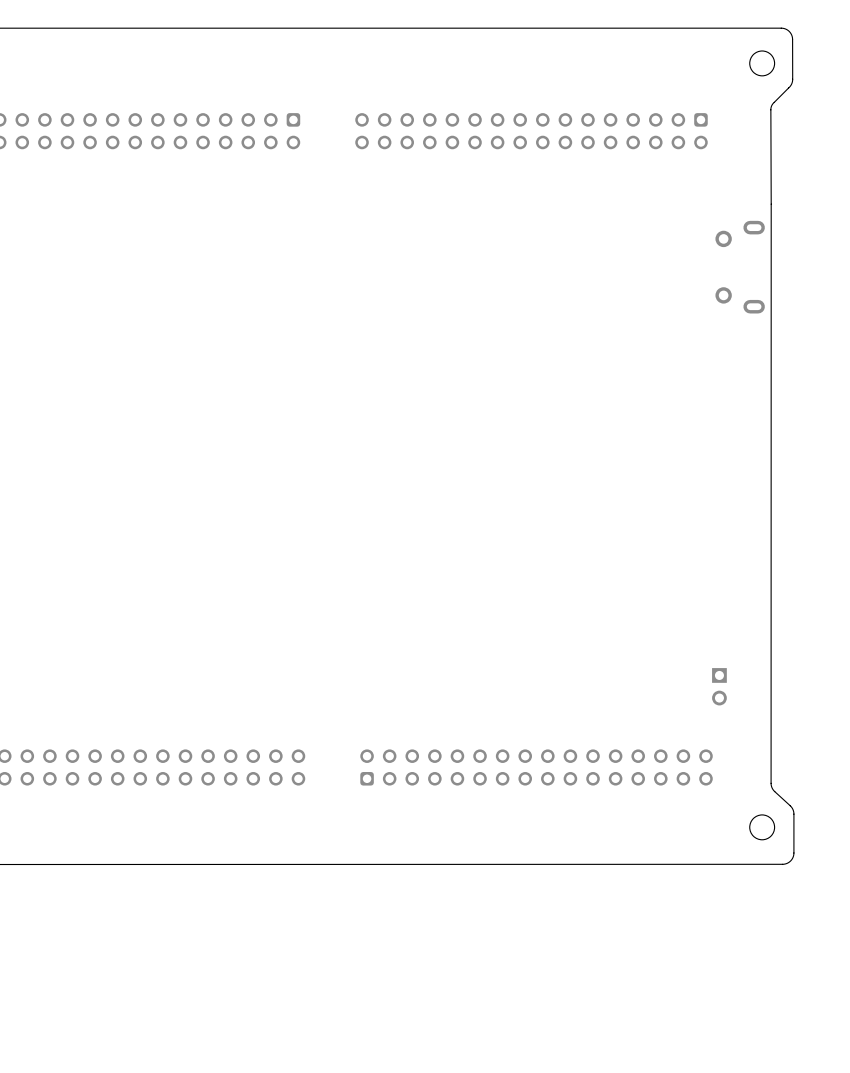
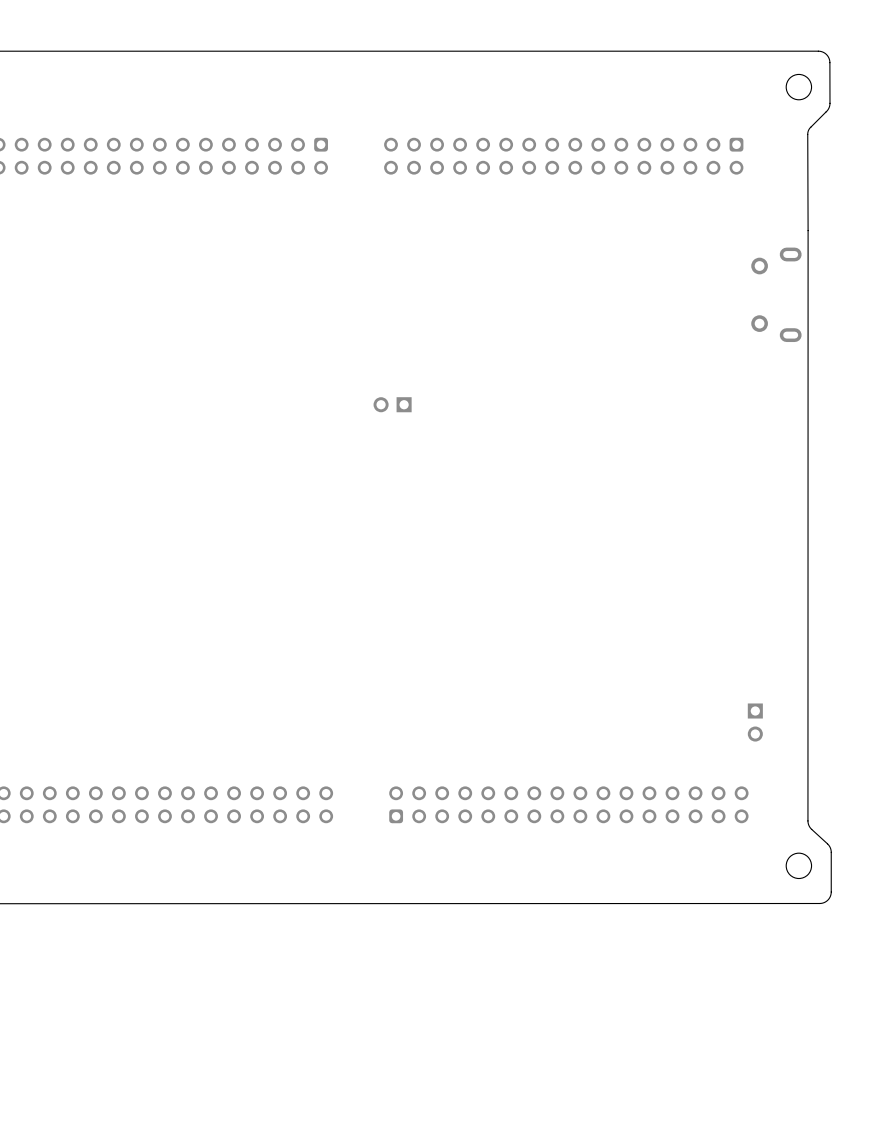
part: none -> (392, 404)

